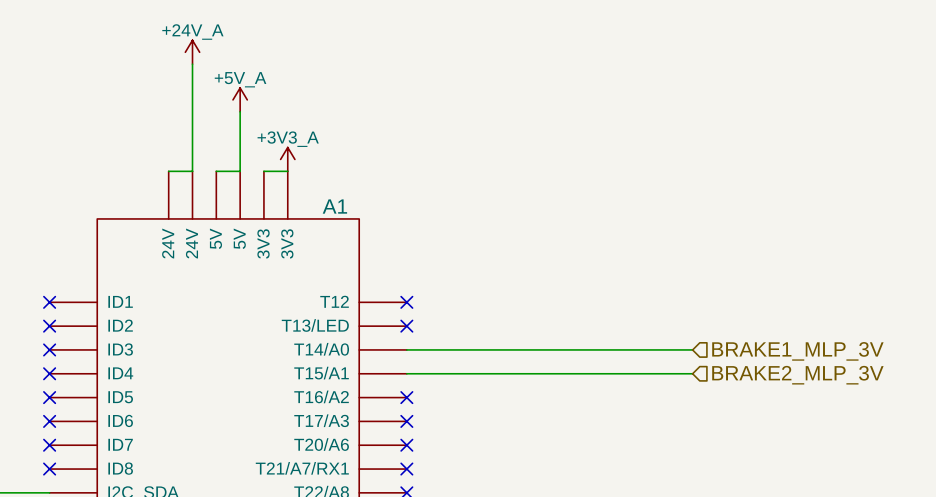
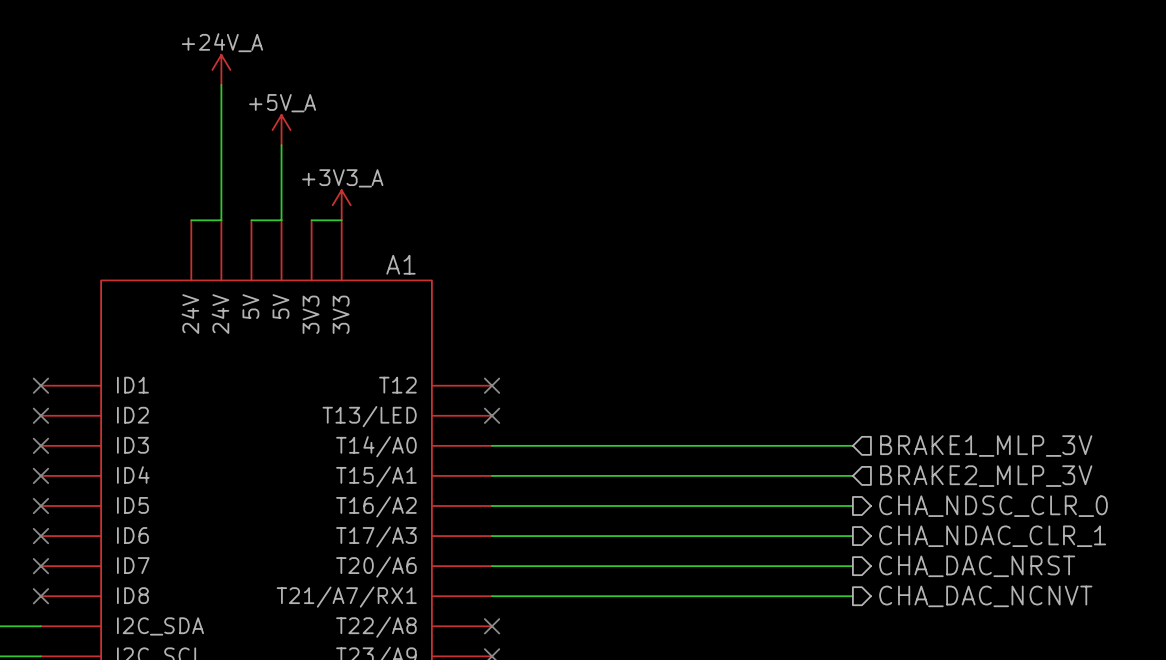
wire: none -> (492, 505) (852, 505)
no-connect mark: (406, 397) -> none
hierarchical label: none -> CHA_NDSC_CLR_0 (993, 506)
wire: none -> (492, 536) (852, 536)
no-connect mark: (406, 421) -> none
hierarchical label: none -> CHA_NDAC_CLR_1 (992, 536)
wire: none -> (492, 566) (852, 566)
no-connect mark: (406, 445) -> none
hierarchical label: none -> CHA_DAC_NRST (977, 566)
wire: none -> (492, 596) (852, 596)
no-connect mark: (406, 469) -> none
hierarchical label: none -> CHA_DAC_NCNVT (985, 596)

